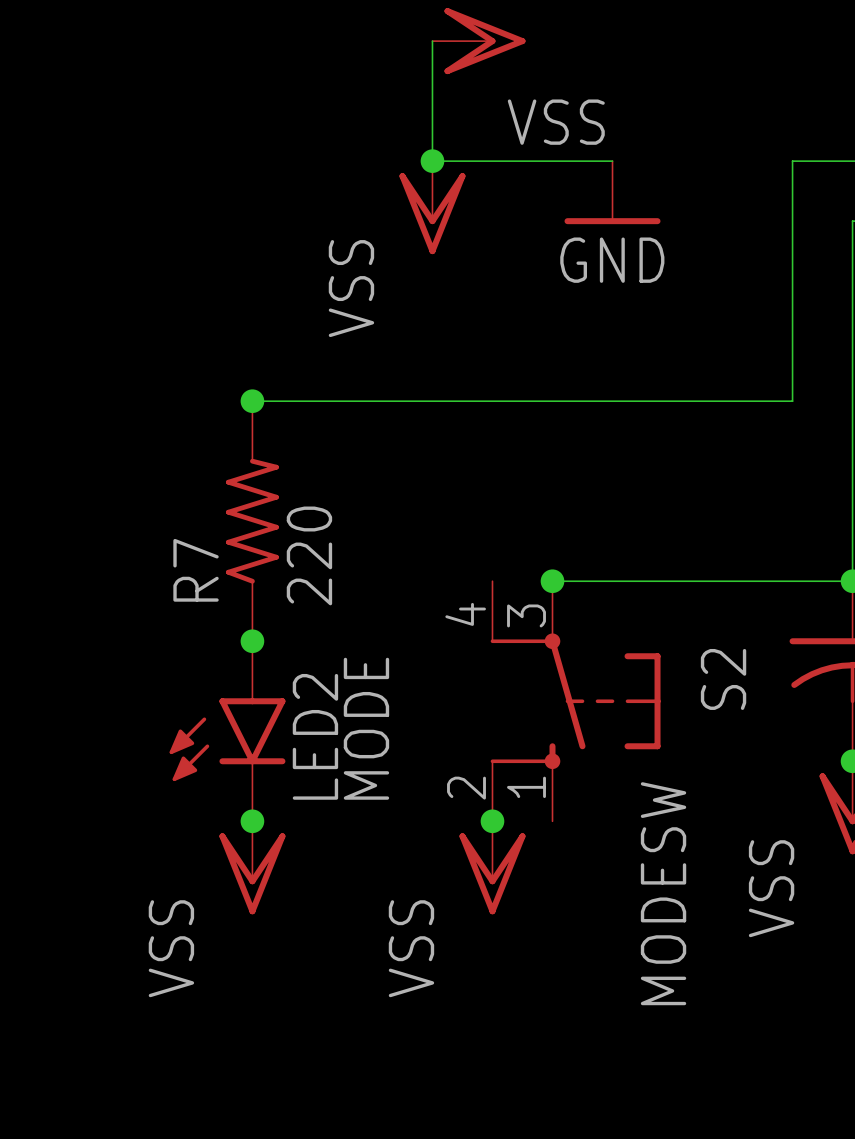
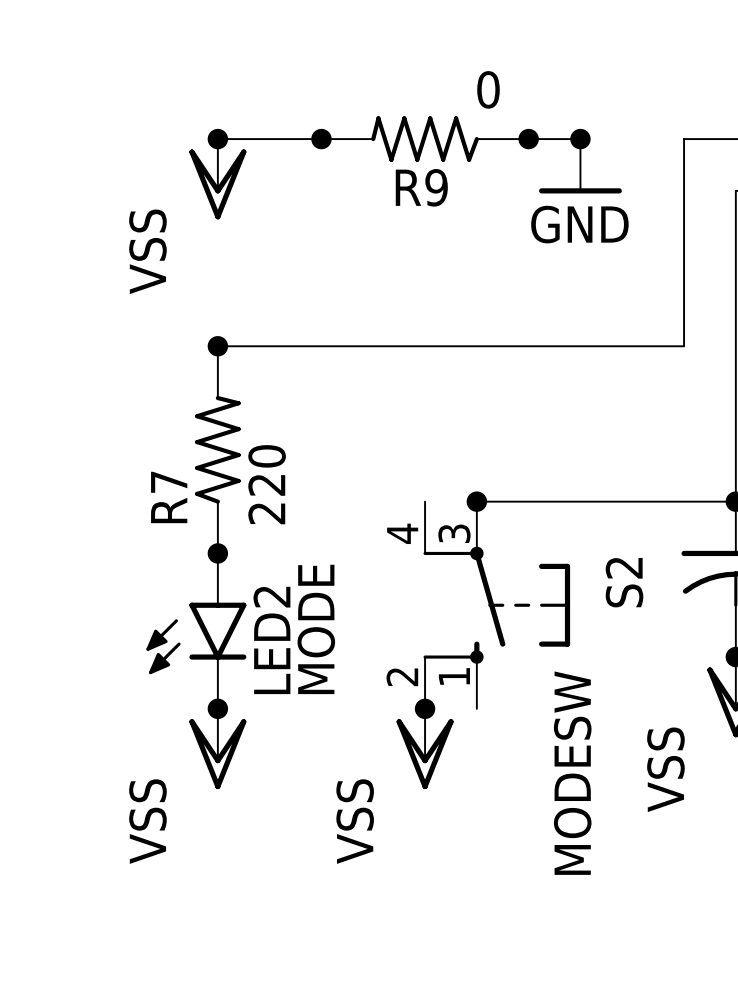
wire: (432, 41) (432, 161) (612, 161) -> (580, 139) (528, 139)
power symbol: VSS (478, 41) -> none
wire: none -> (217, 139) (321, 139)
junction: none -> (217, 139)
junction position: (432, 161) -> (321, 139)
R9: none -> 0 (425, 139)
junction: none -> (528, 139)
junction: none -> (580, 139)
power symbol position: GND (612, 192) -> GND (580, 166)
power symbol: none -> VSS (217, 179)
power symbol: VSS (432, 207) -> none

